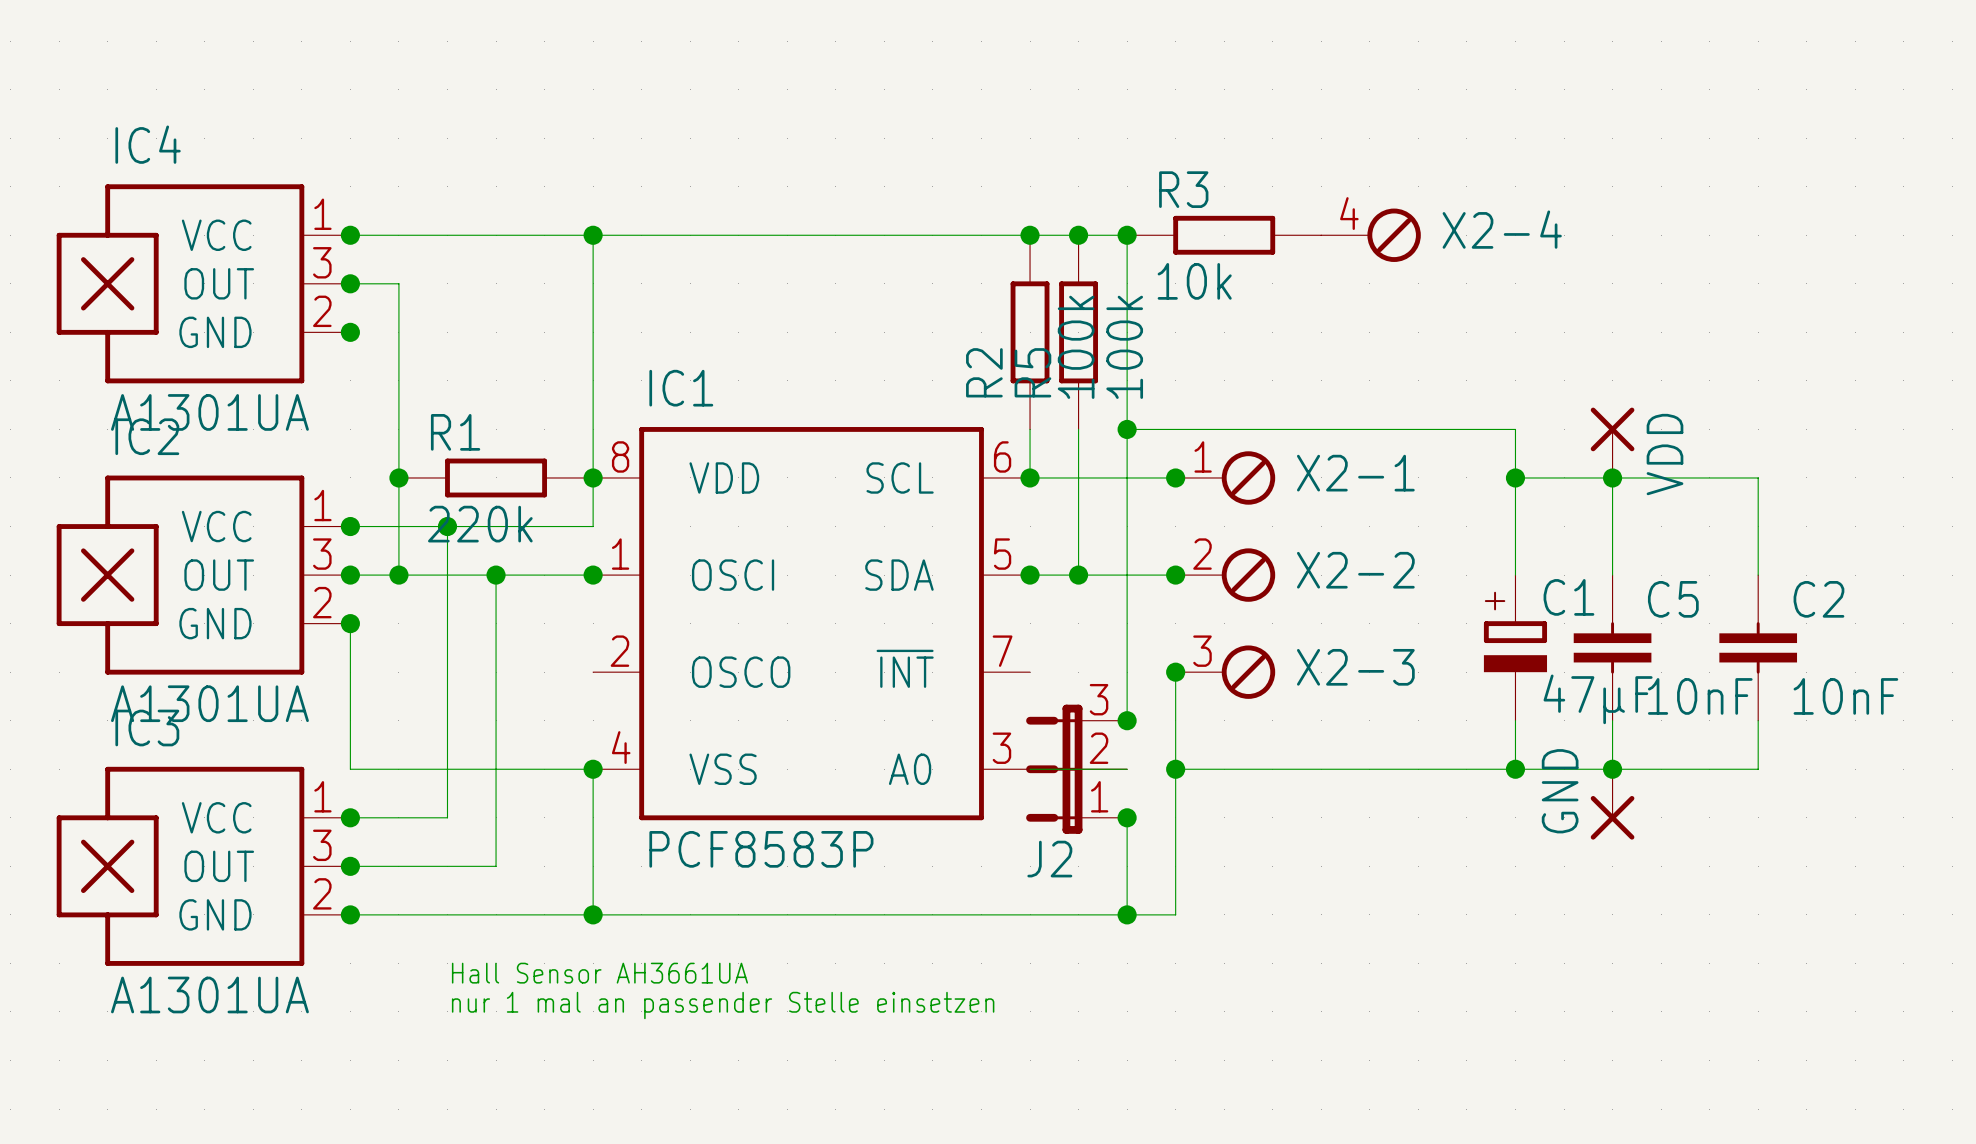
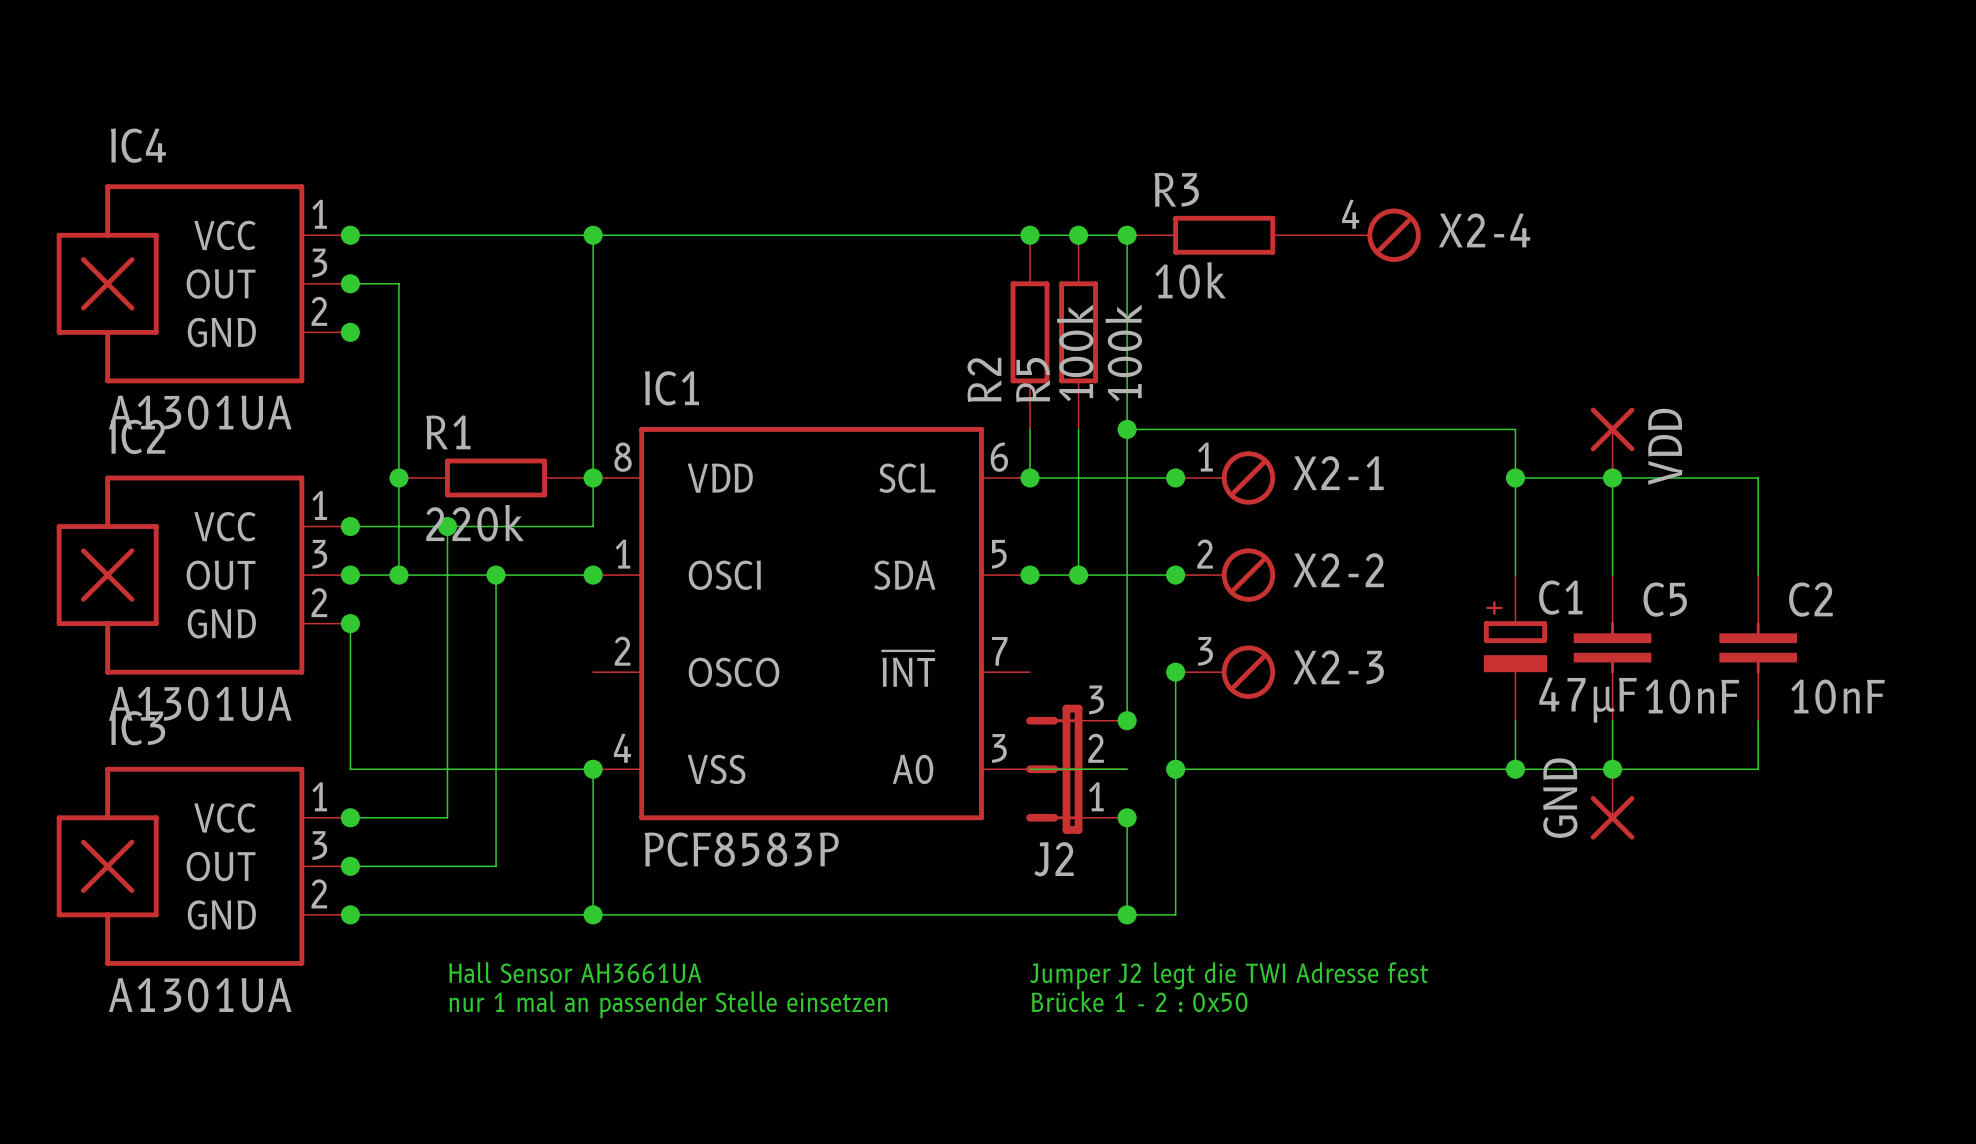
text: none -> Jumper J2 legt die TWI Adresse fest (1229, 975)
text: none -> Brücke 1 - 2 : 0x50 (1139, 1001)

